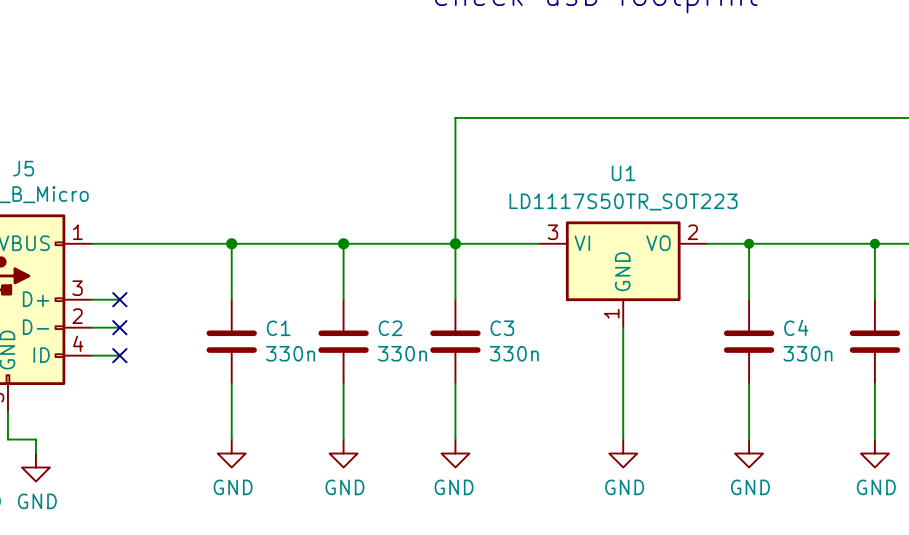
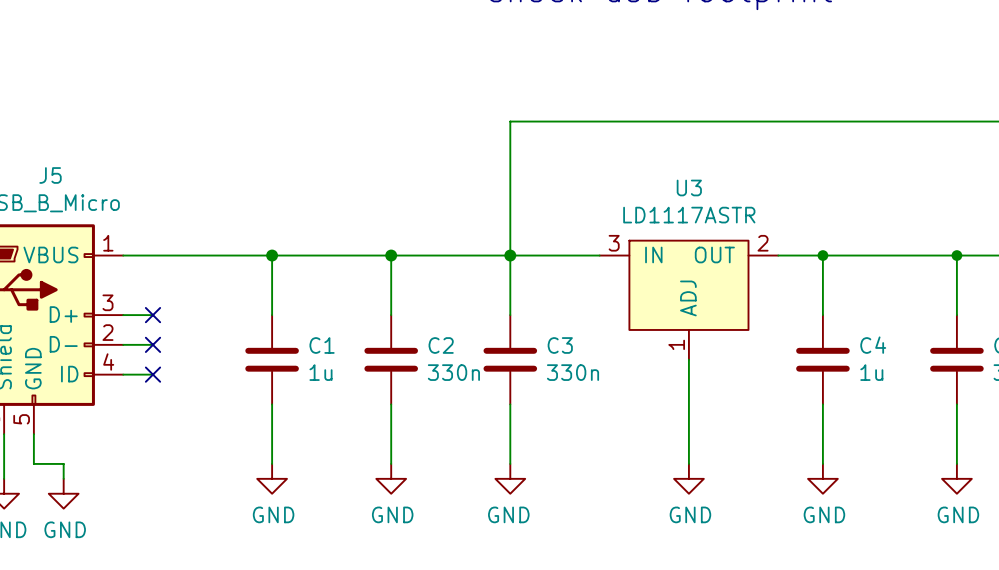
U1: LD1117S50TR_SOT223 (623, 274) -> none
U3: none -> LD1117ASTR (688, 300)
C1 value: 330n (290, 353) -> 1u (320, 372)
C4 value: 330n (807, 353) -> 1u (871, 372)

